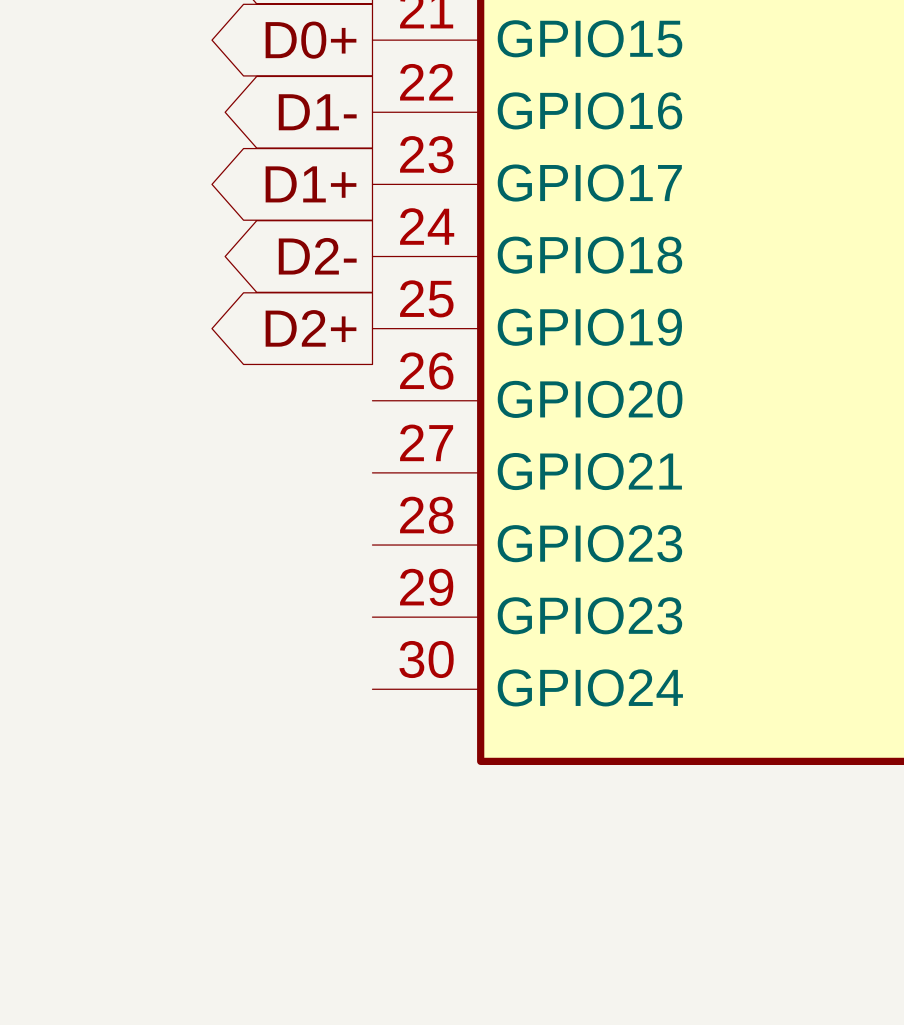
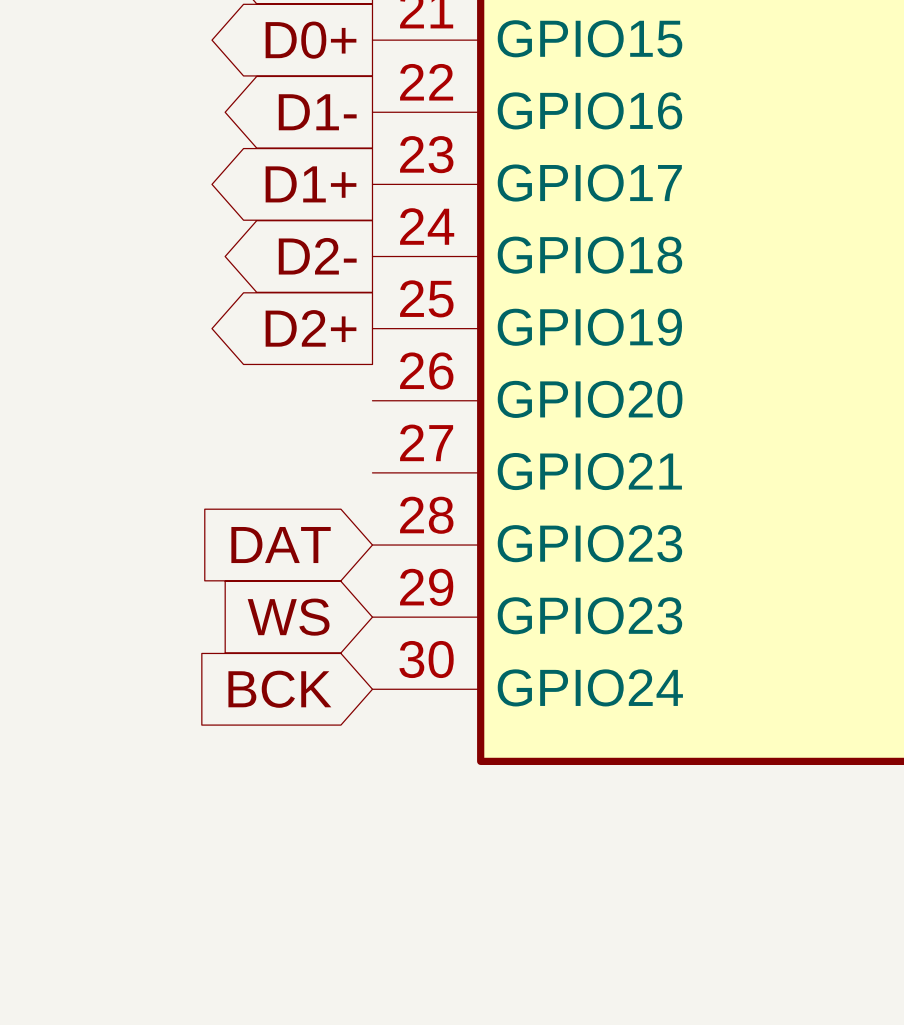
global label: none -> DAT (281, 545)
global label: none -> WS (288, 617)
global label: none -> BCK (279, 689)

